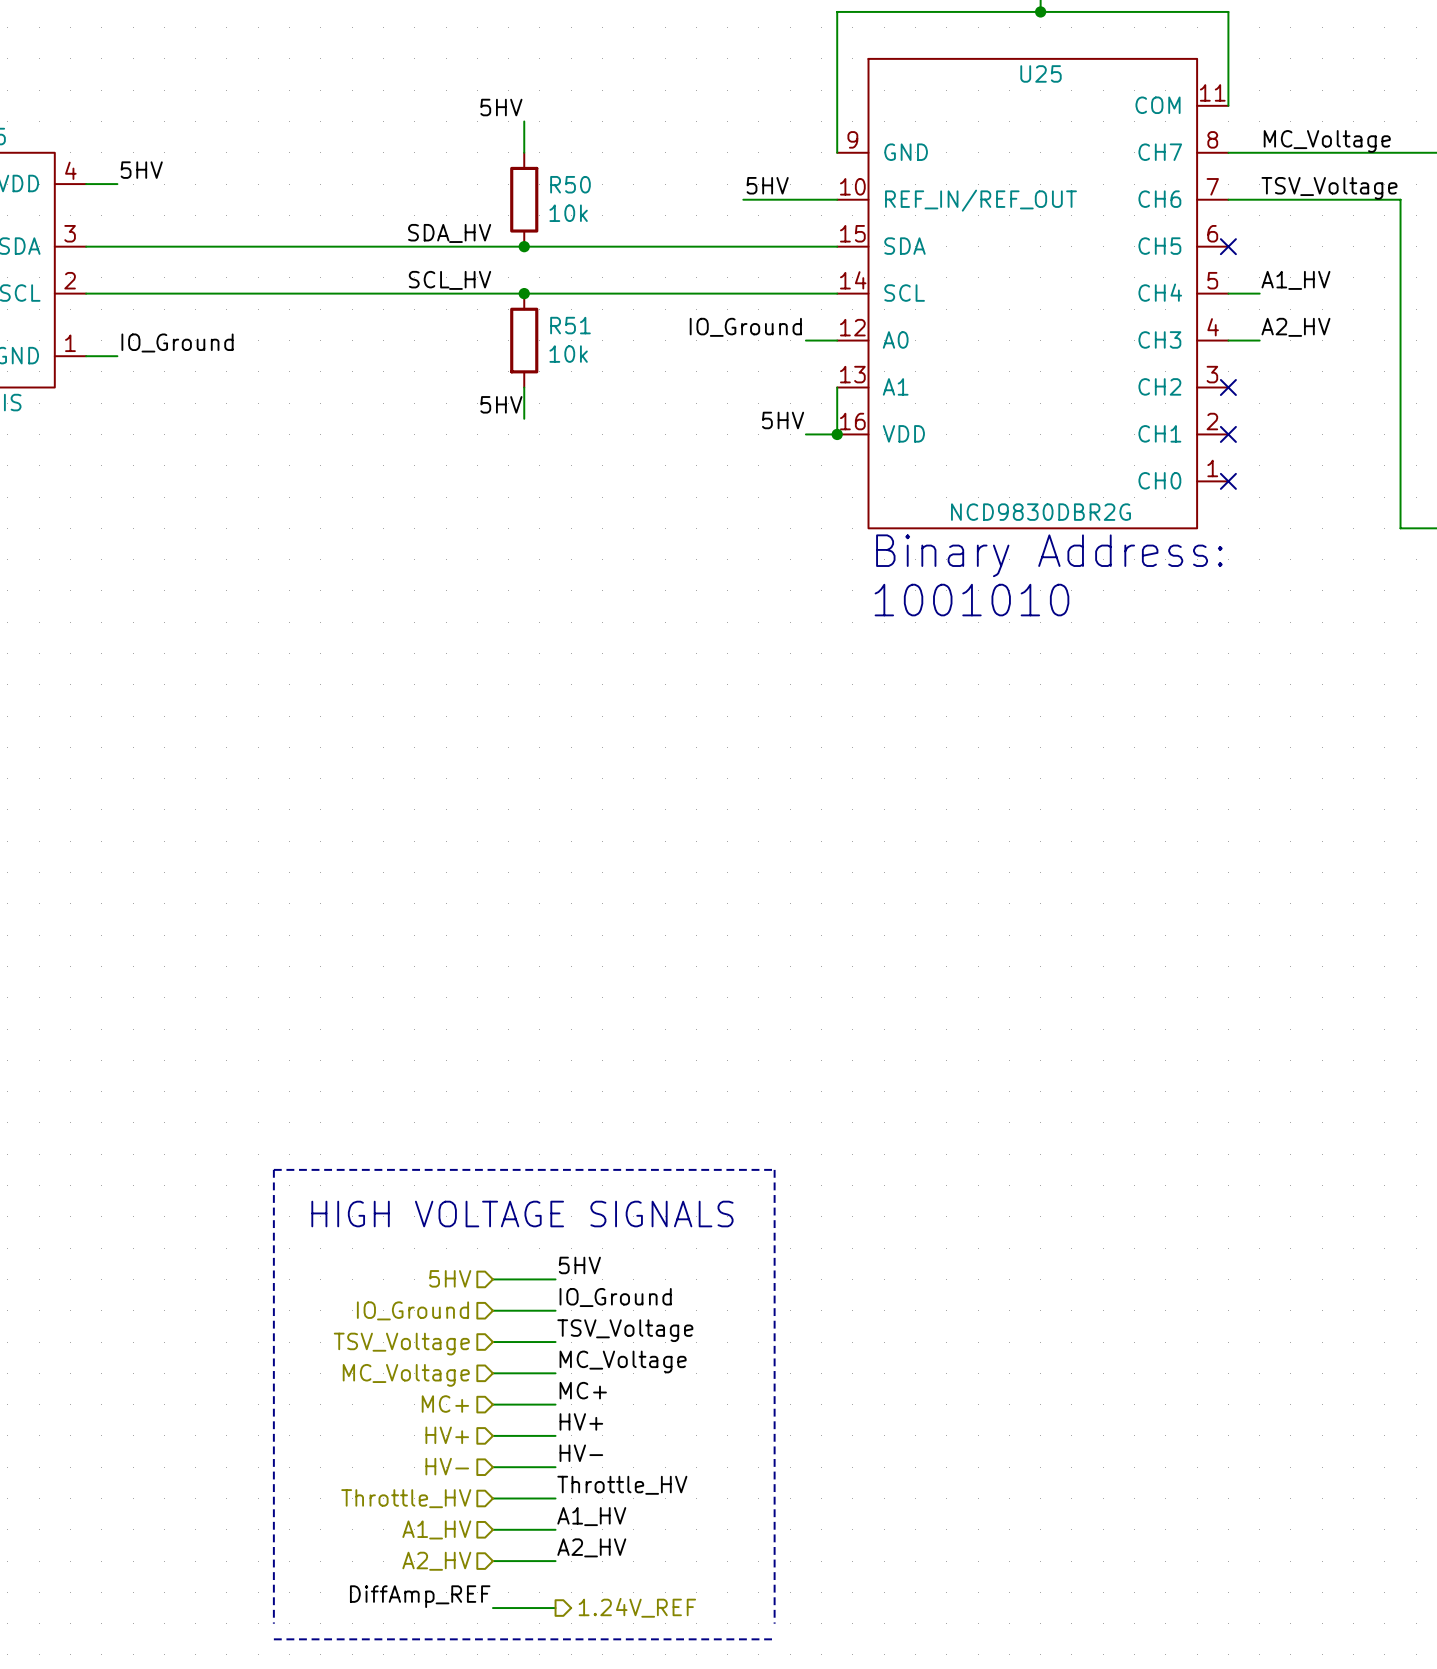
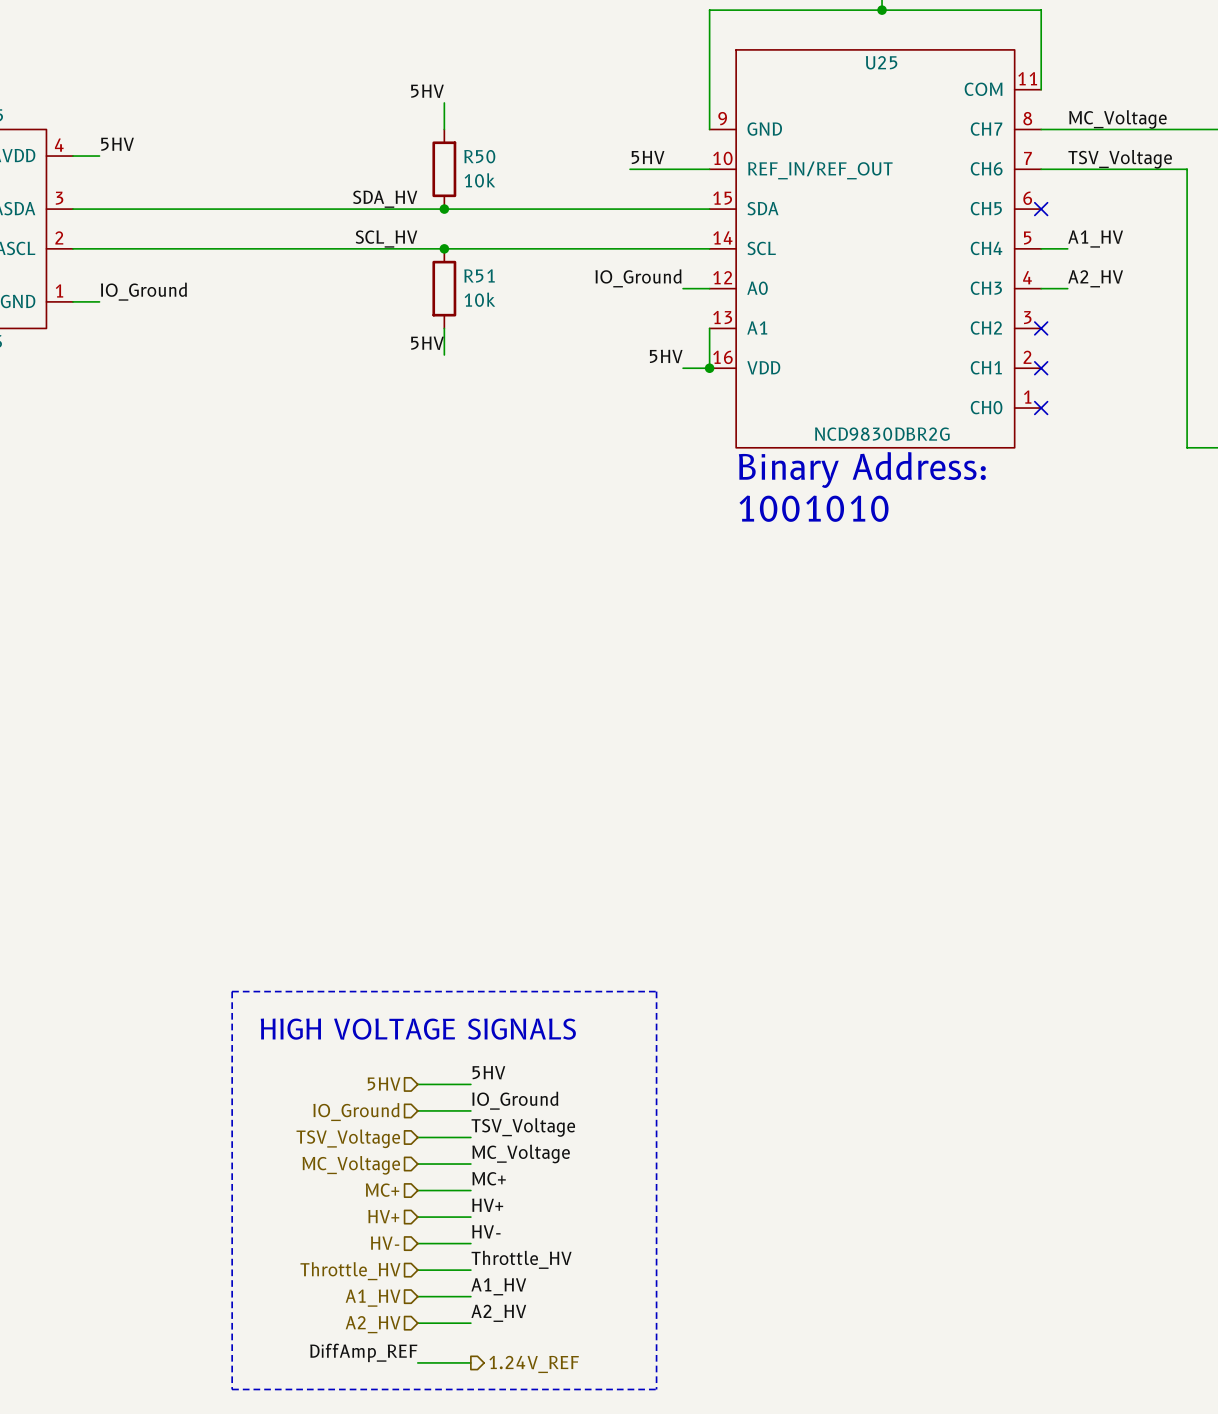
line: none -> (232, 1376) (232, 1389)
line: none -> (656, 1376) (656, 1389)

